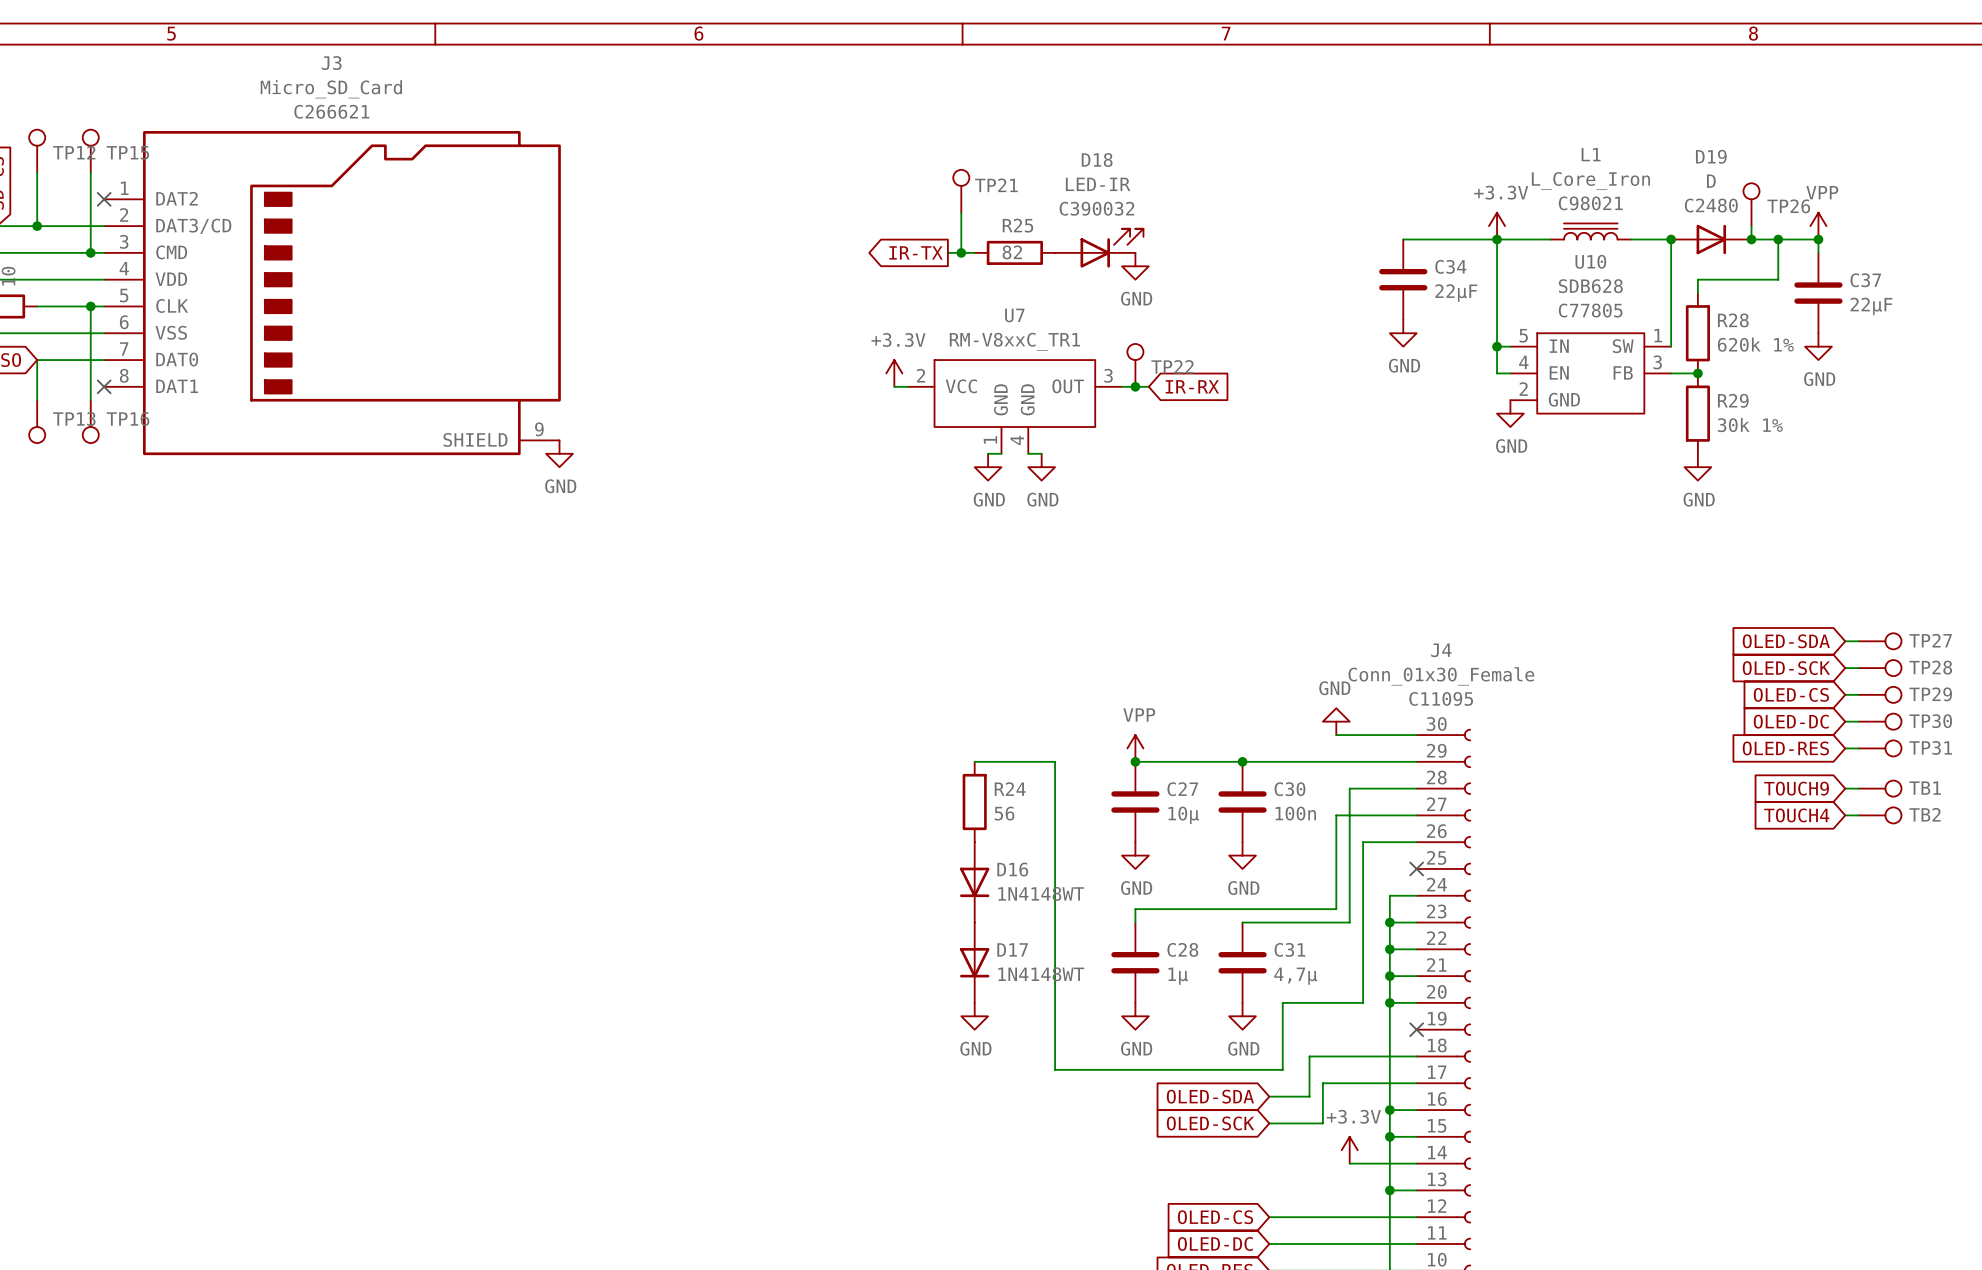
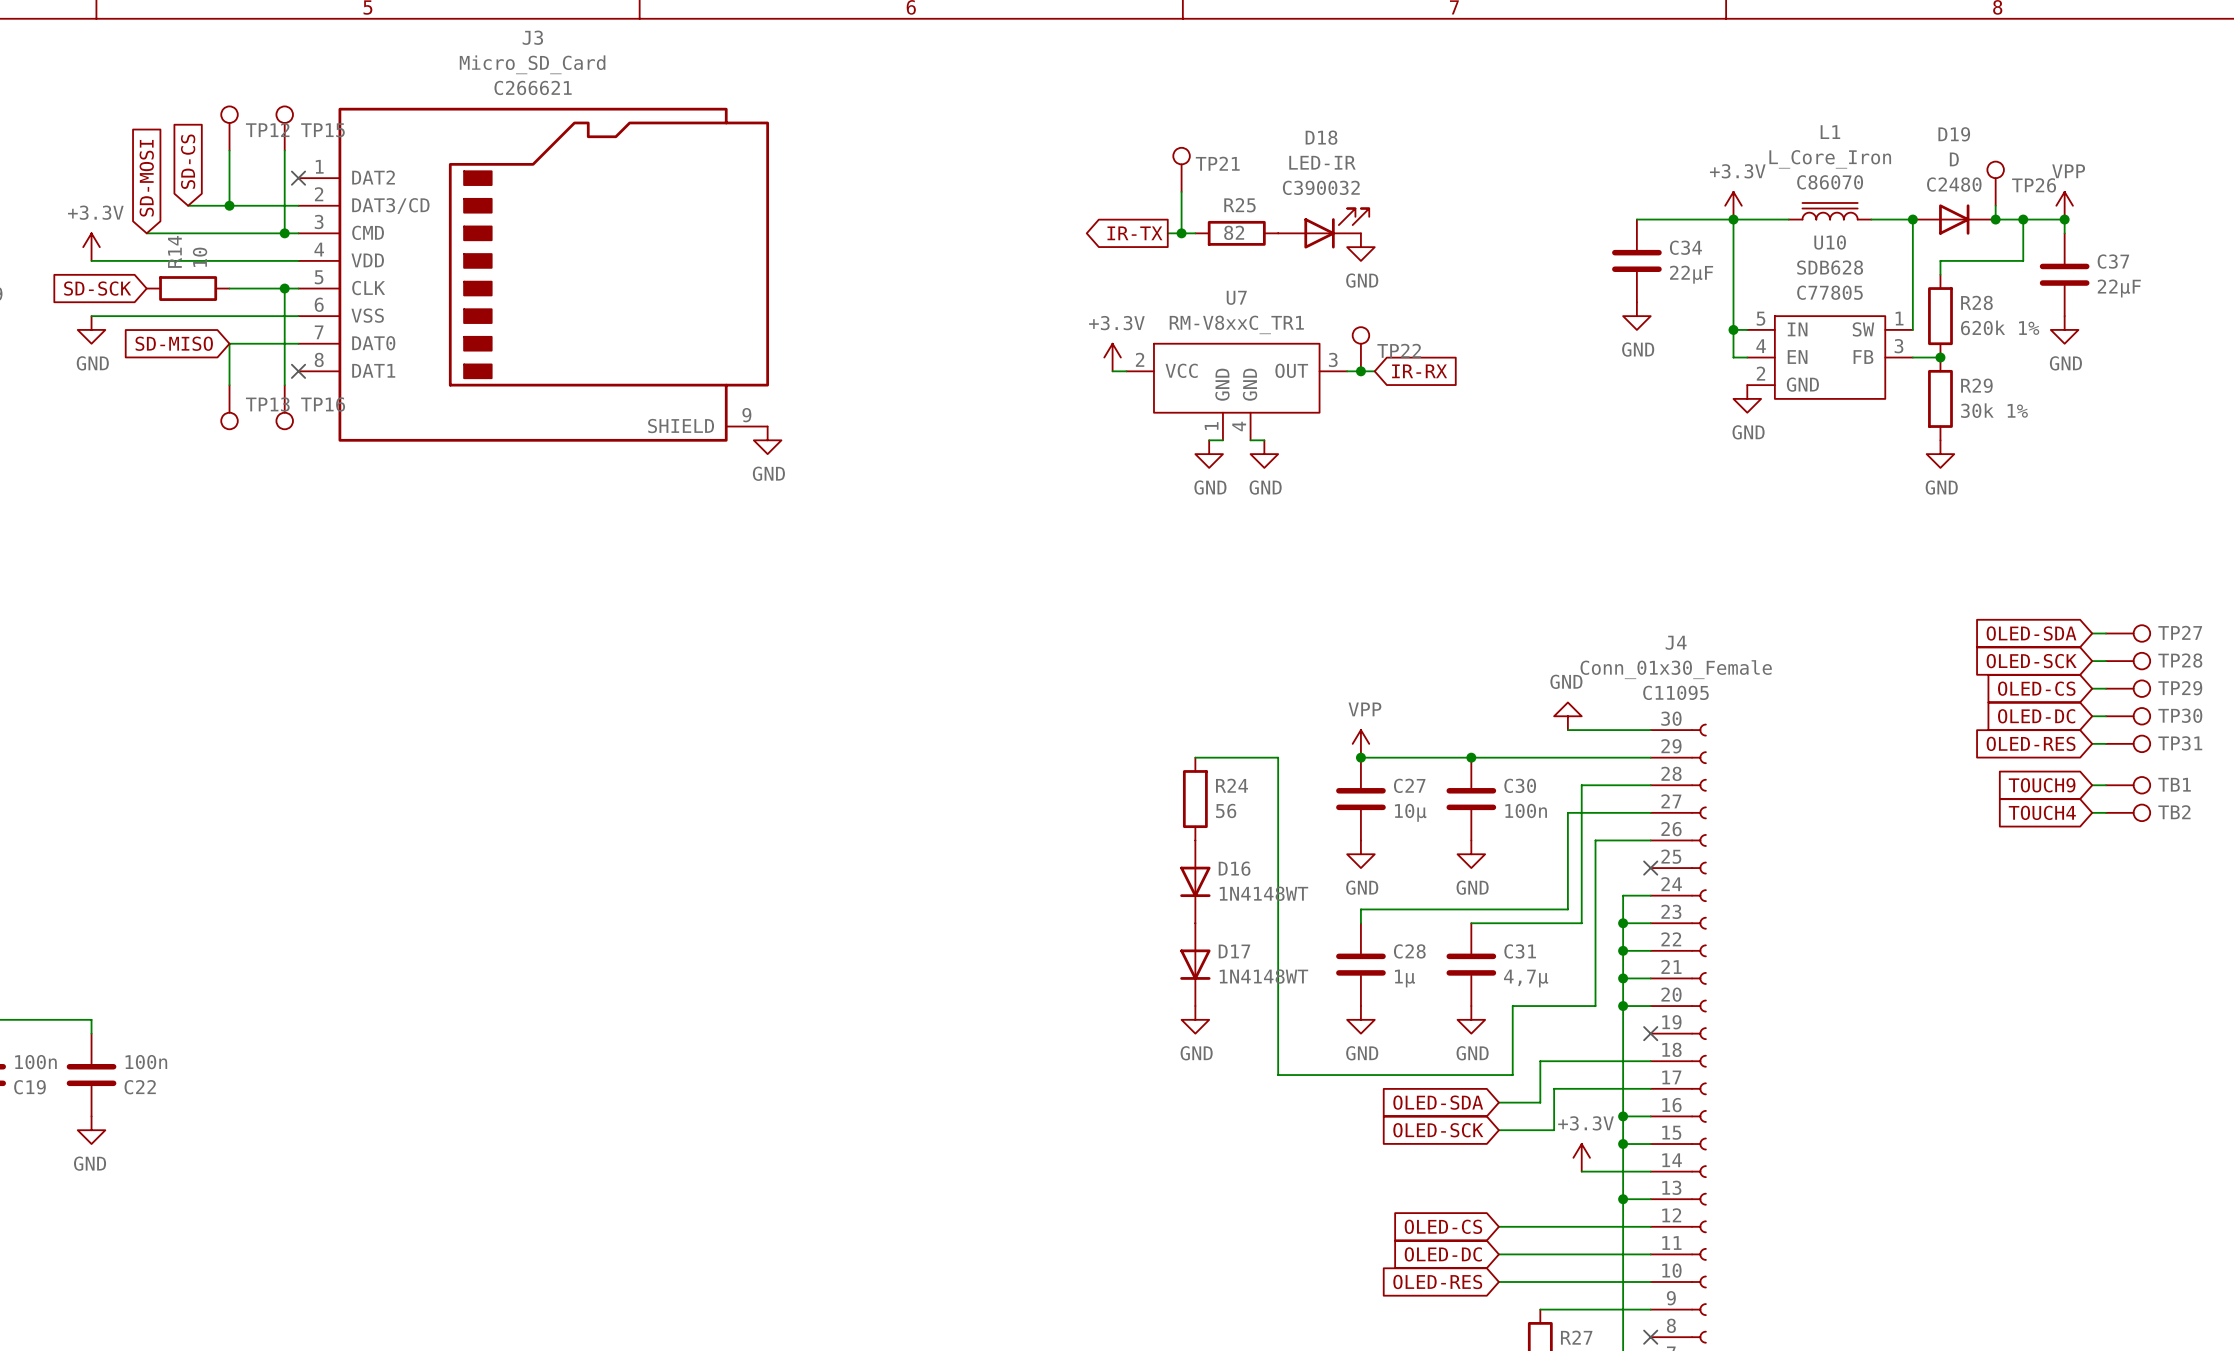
L1 text: C98021 (1590, 203) -> C86070 (1830, 182)

